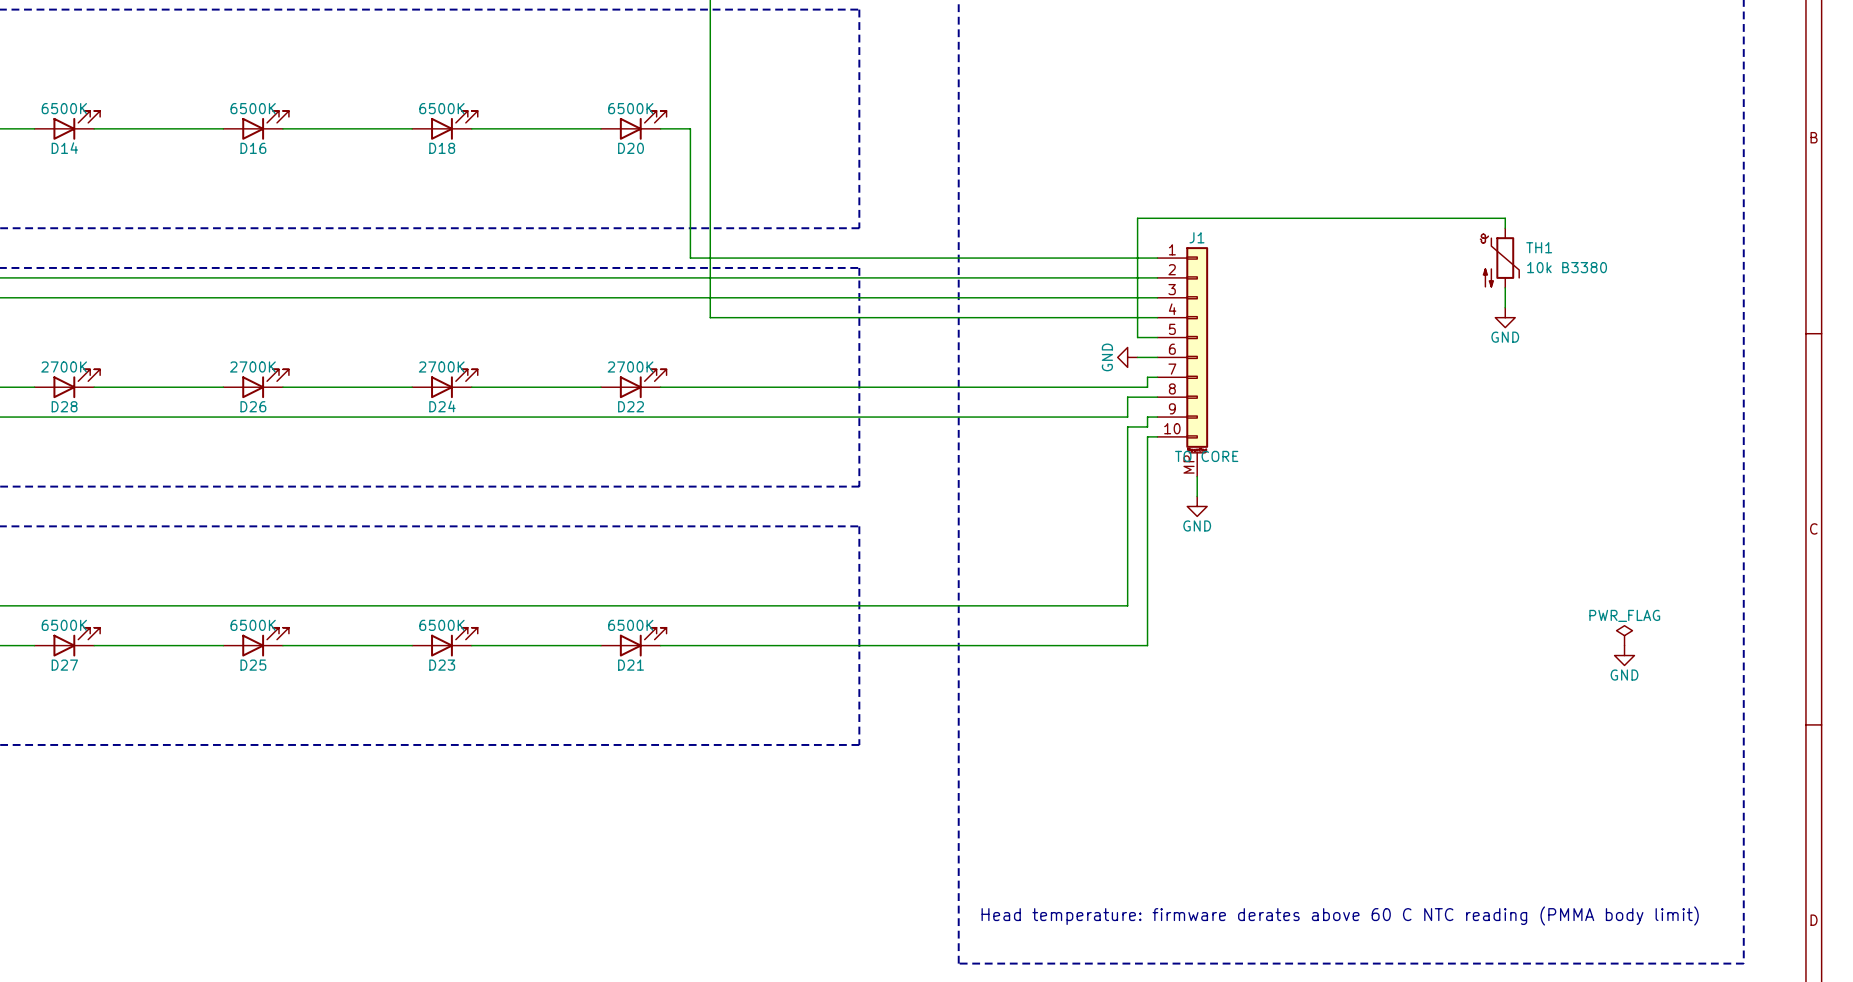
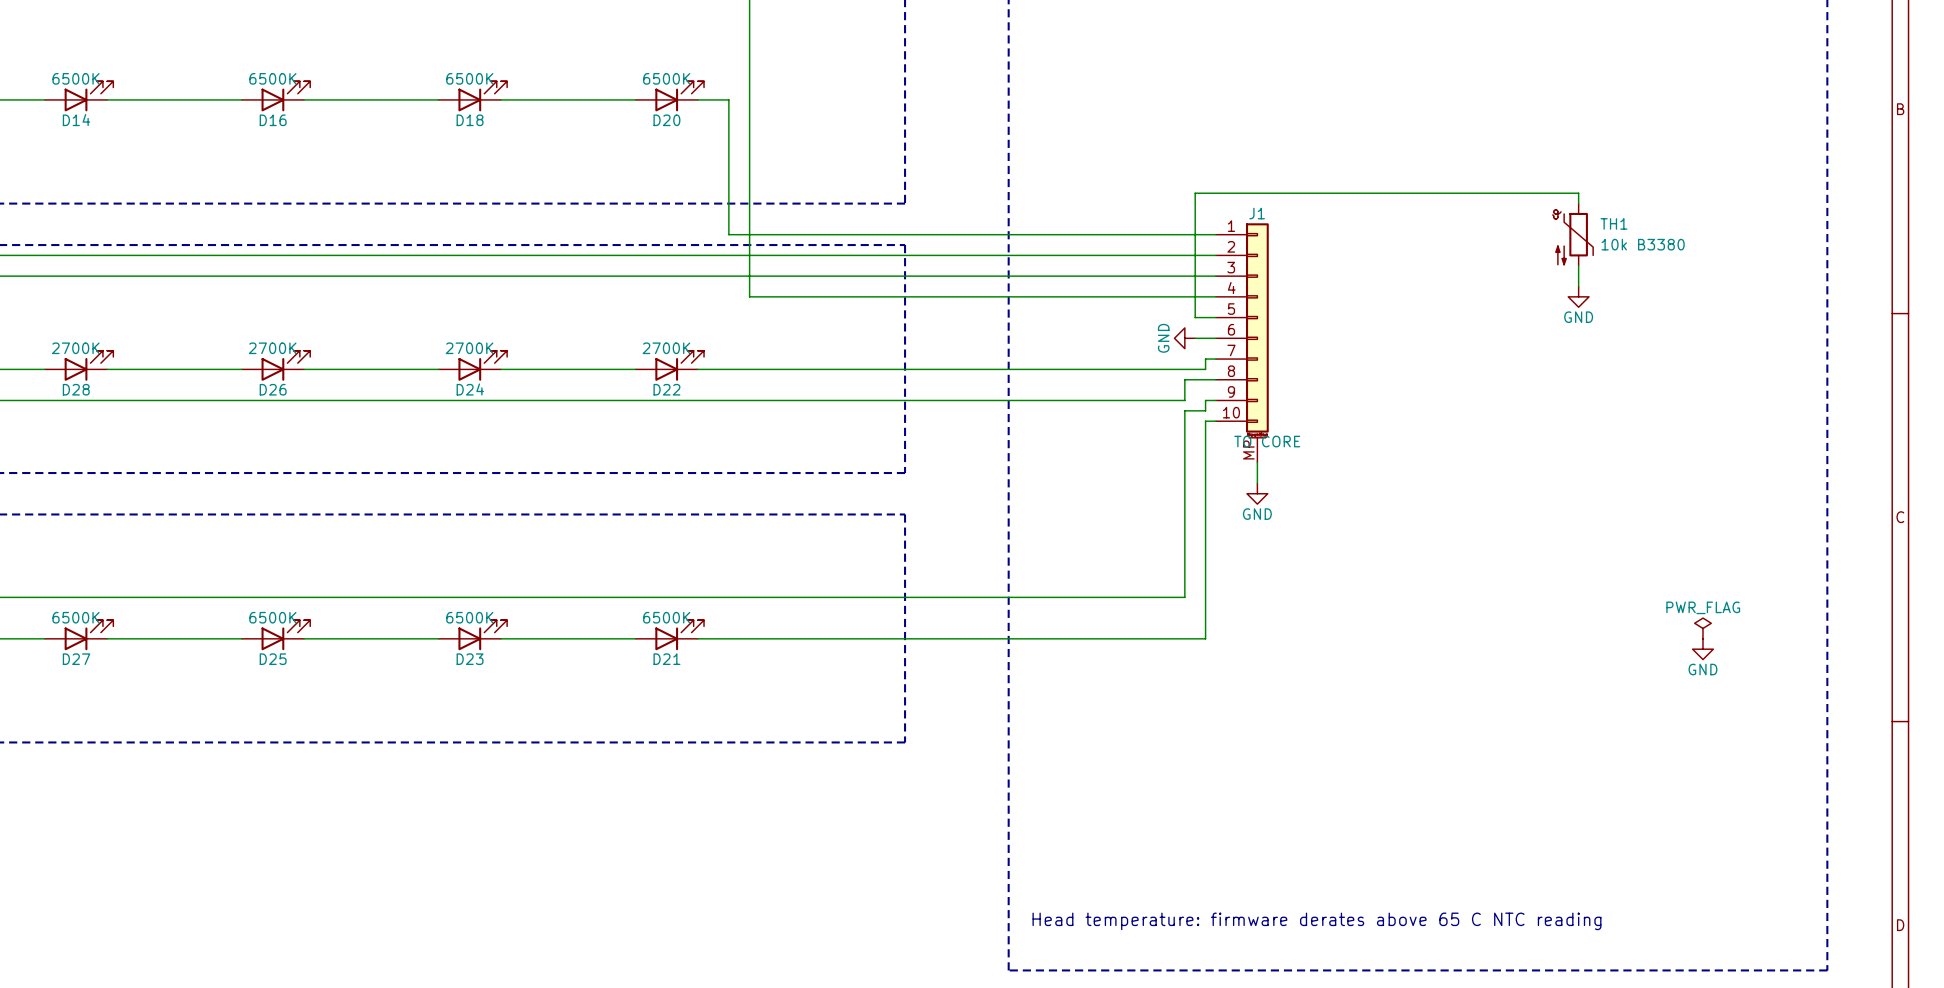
text: Head temperature: firmware derates above 60 C NTC reading (PMMA body limit) (1340, 915) -> Head temperature: firmware derates above 65 C NTC reading (1316, 921)

